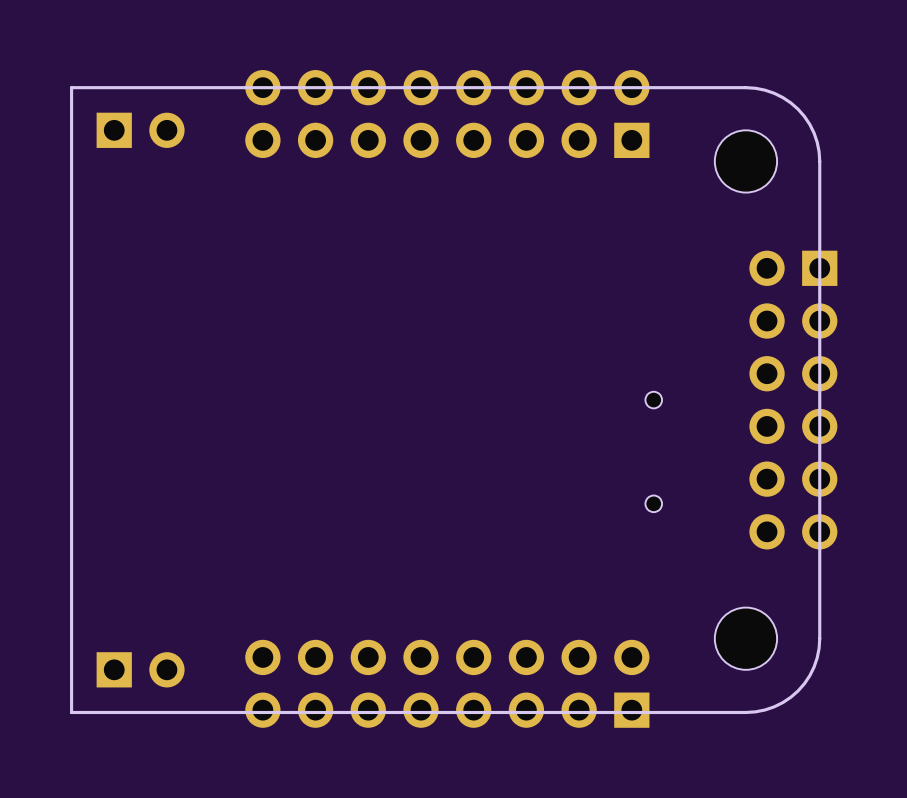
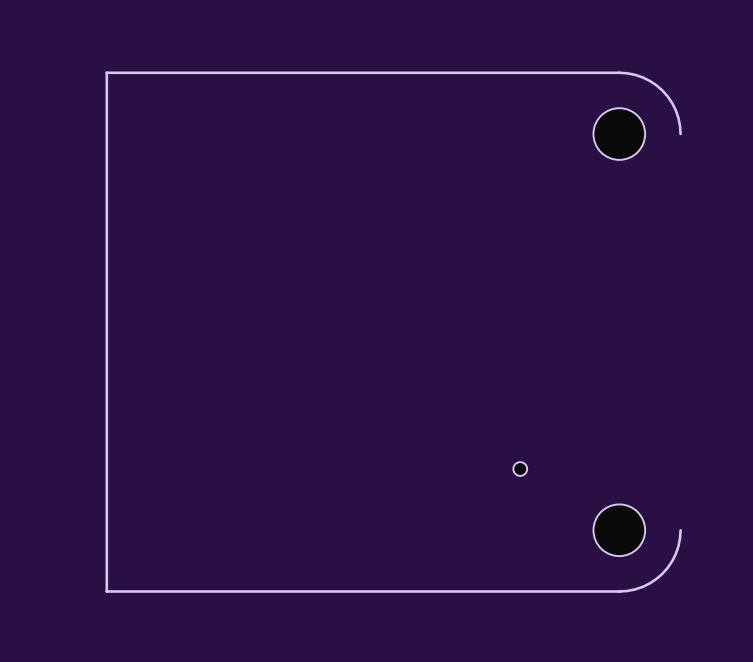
board edge: (128, 87) (71, 87) (71, 712) (128, 712) -> (106, 72) (106, 591)
part: (447, 114) -> none
part: (140, 130) -> none
board edge: (819, 161) (819, 638) -> none
part: (653, 400) -> none
part: (793, 400) -> none
part position: (653, 503) -> (520, 469)
part: (140, 669) -> none
part: (447, 683) -> none

